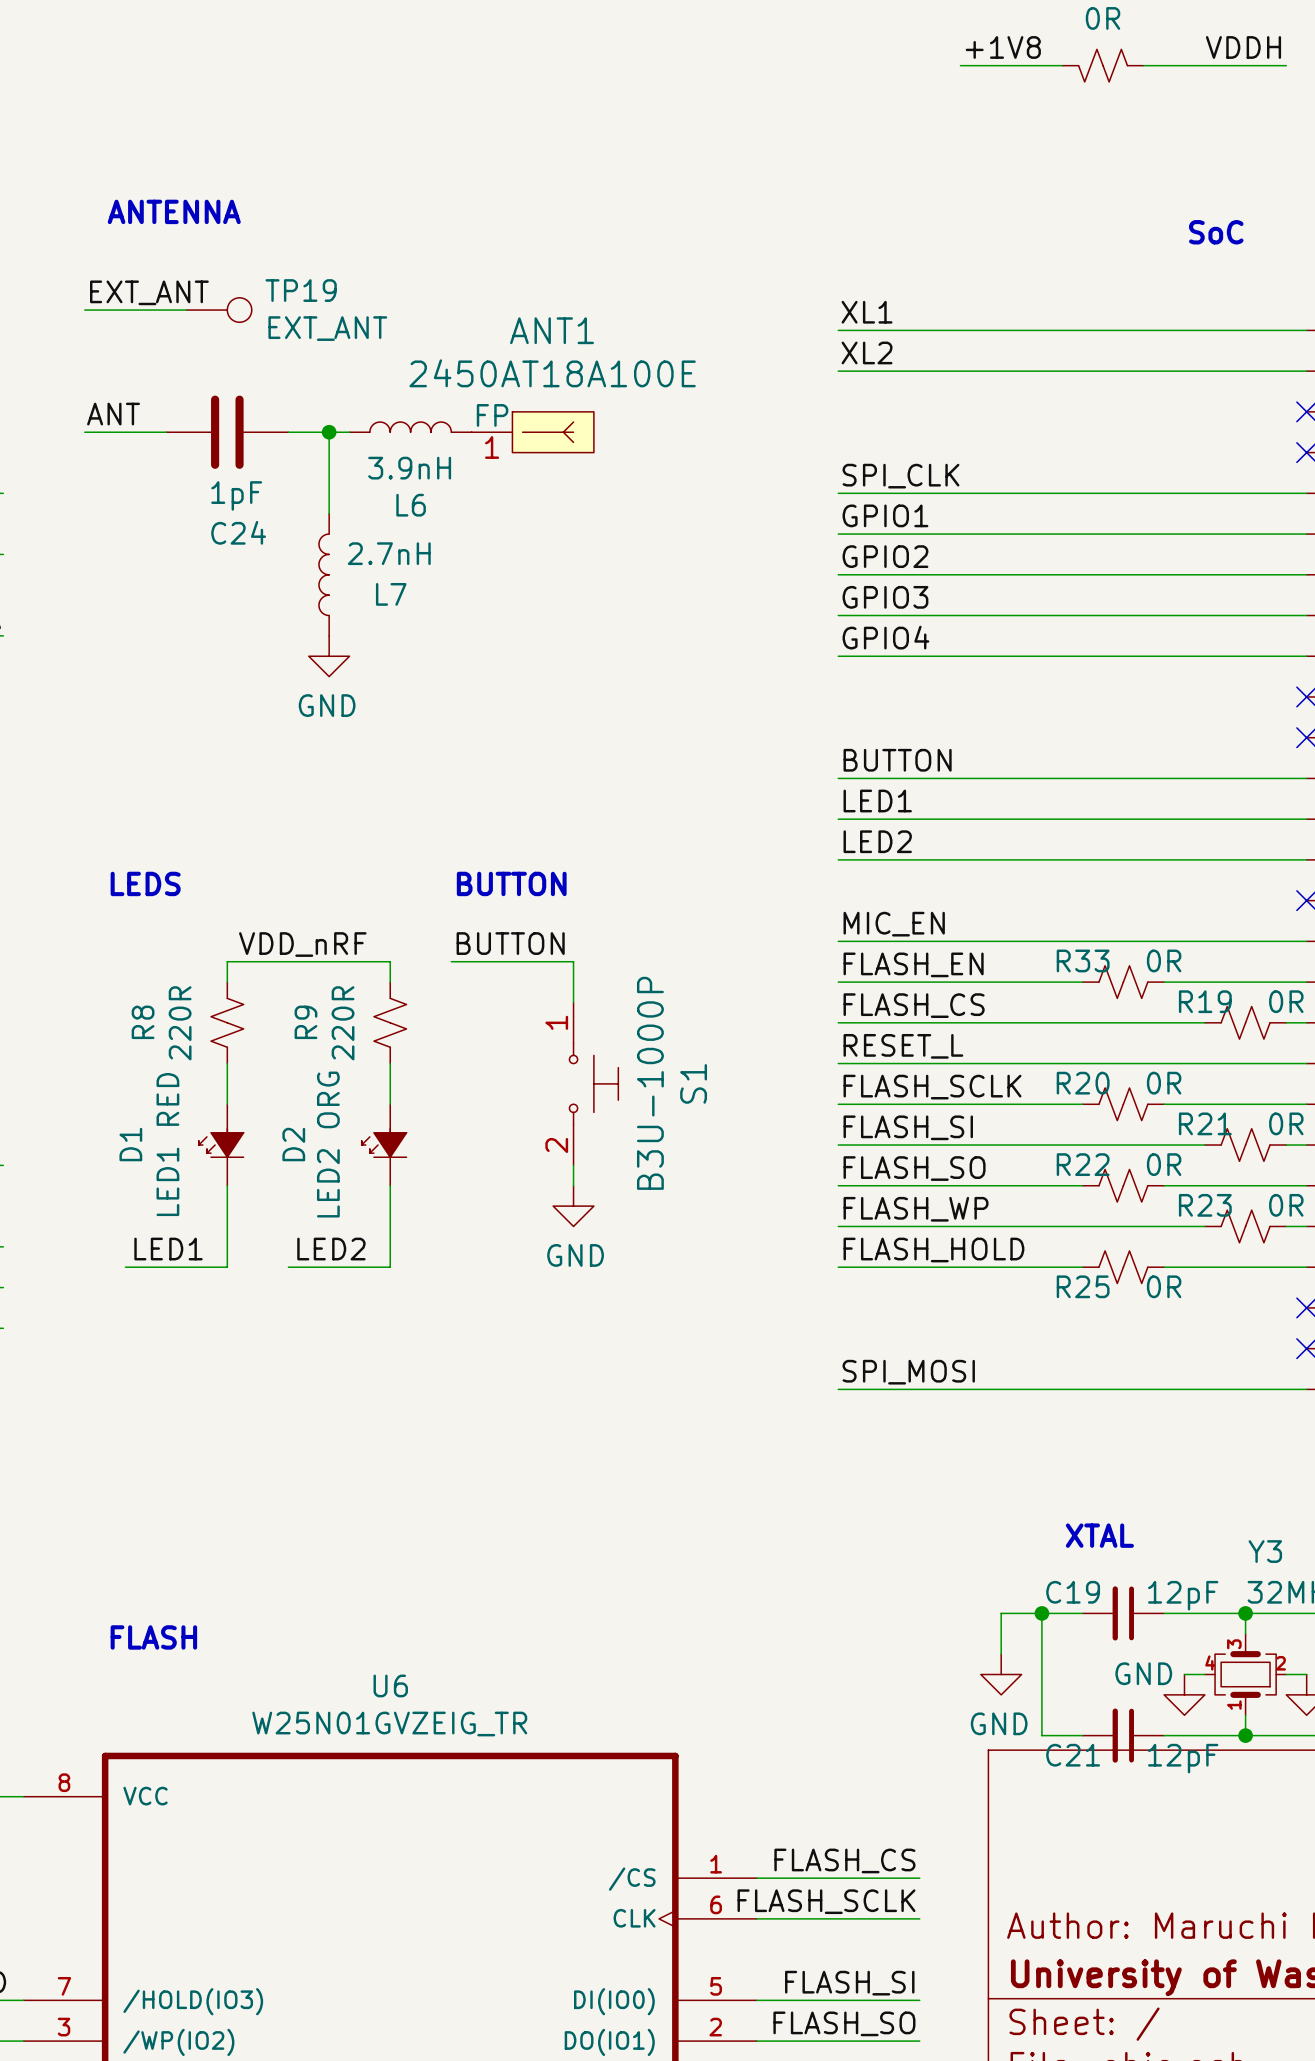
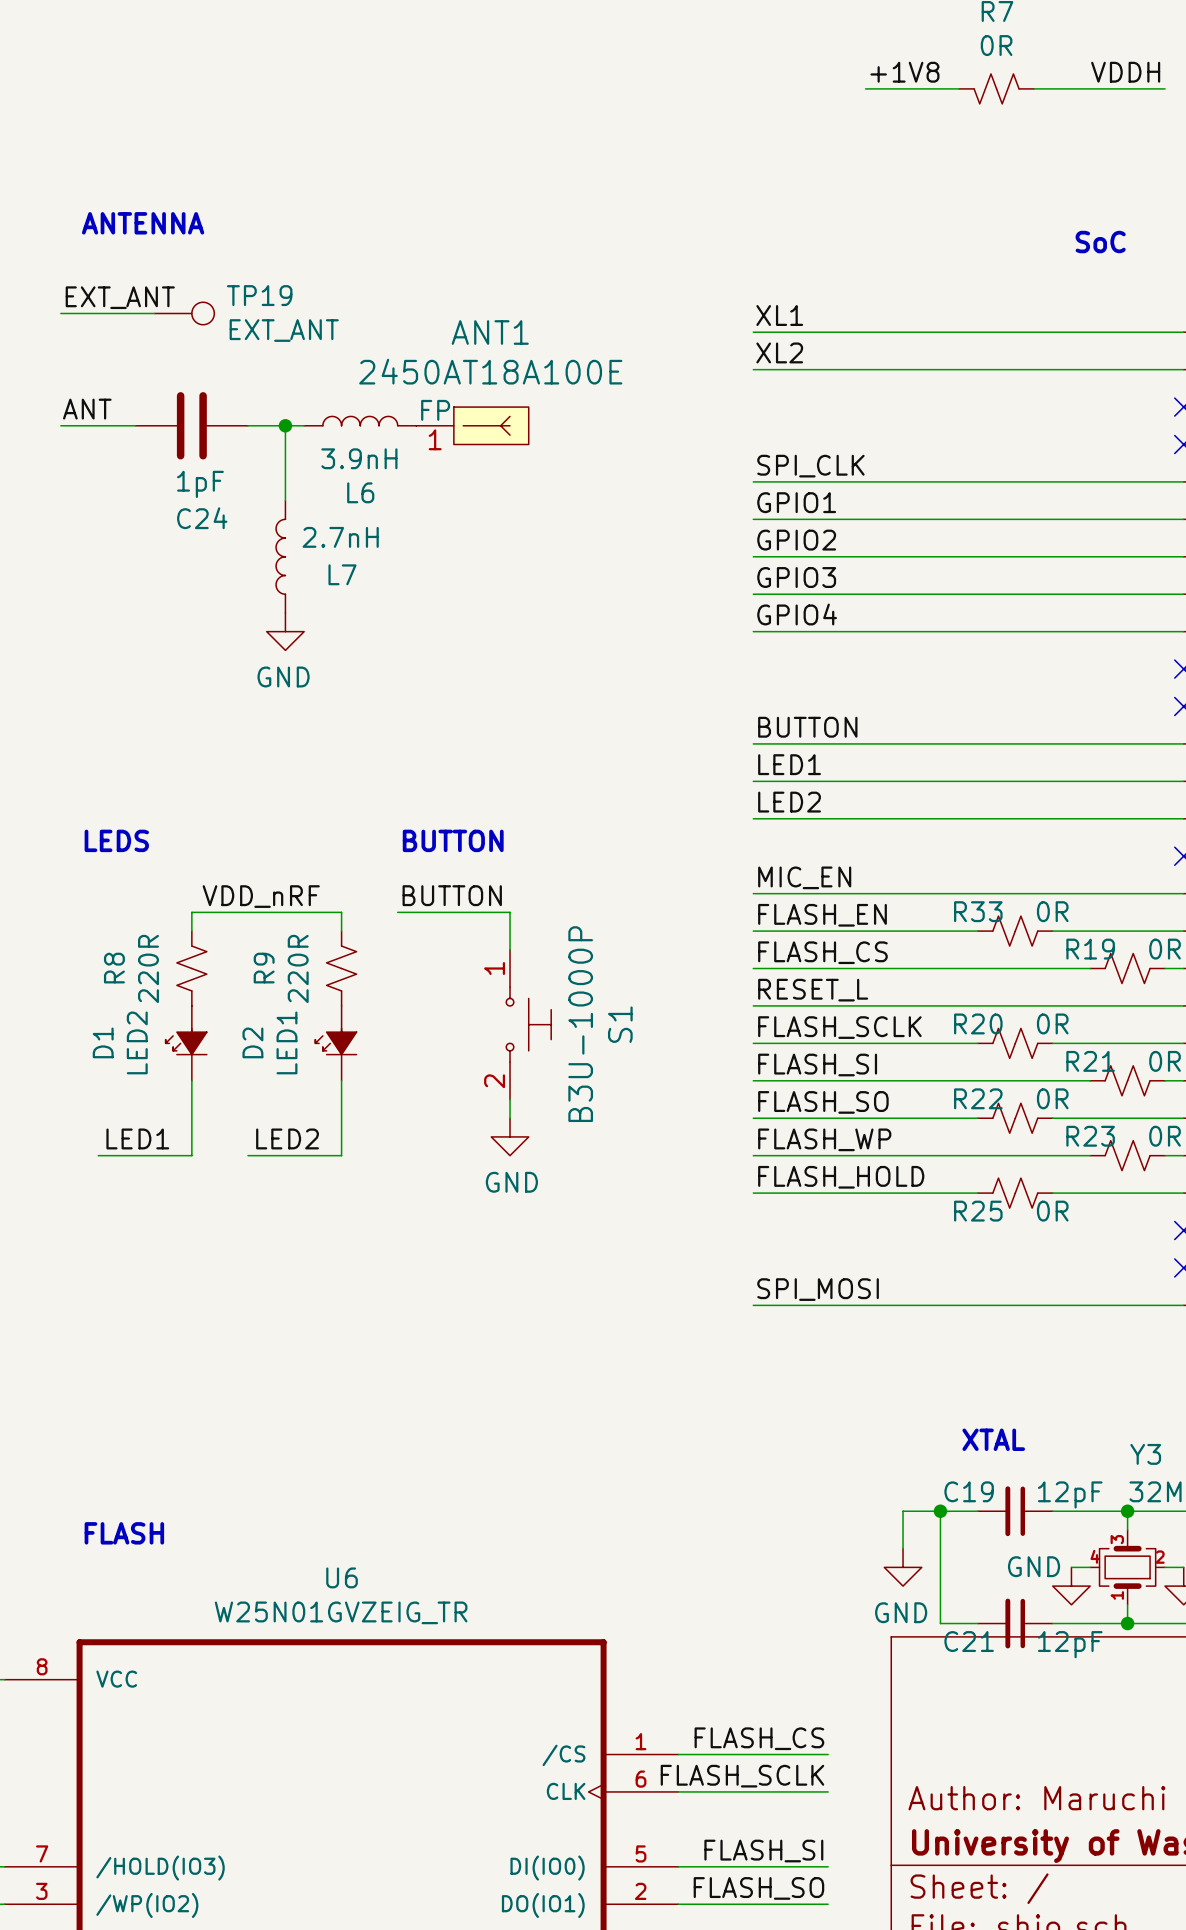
D1 value: LED1 RED (167, 1144) -> LED2 (137, 1042)
D2 value: LED2 ORG (328, 1144) -> LED1 (286, 1042)
D1 position: (221, 1145) -> (186, 1043)
D2 position: (384, 1145) -> (335, 1043)
wire: (227, 1226) (227, 1267) (125, 1267) -> (191, 1155) (98, 1155)
wire: (390, 1226) (390, 1267) (288, 1267) -> (341, 1155) (248, 1155)
label position: LED1 (168, 1249) -> LED1 (137, 1138)
label position: LED2 (331, 1249) -> LED2 (287, 1138)

